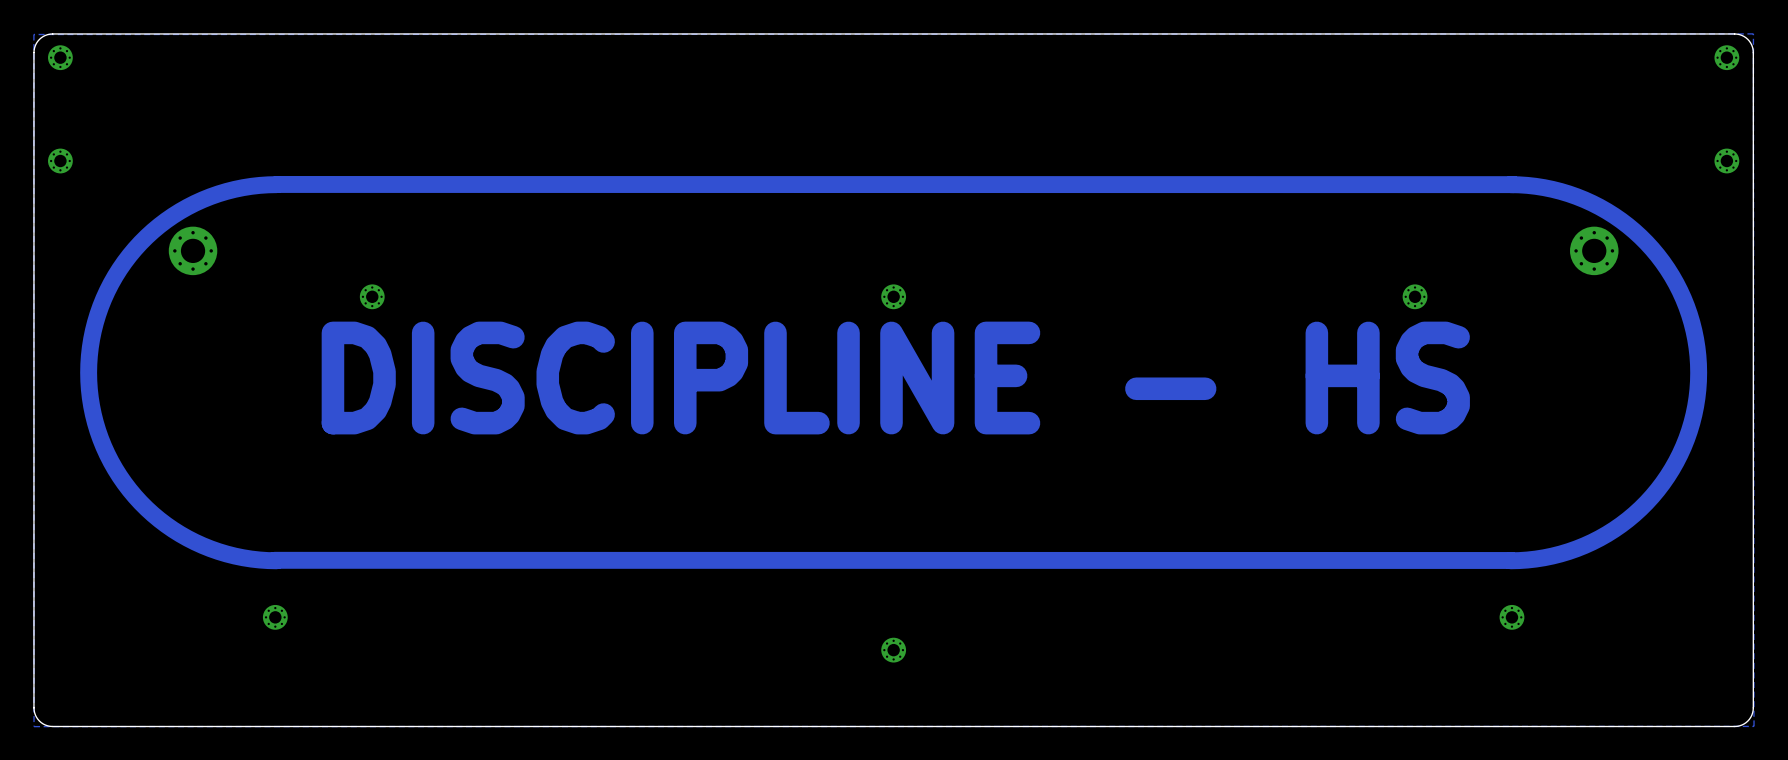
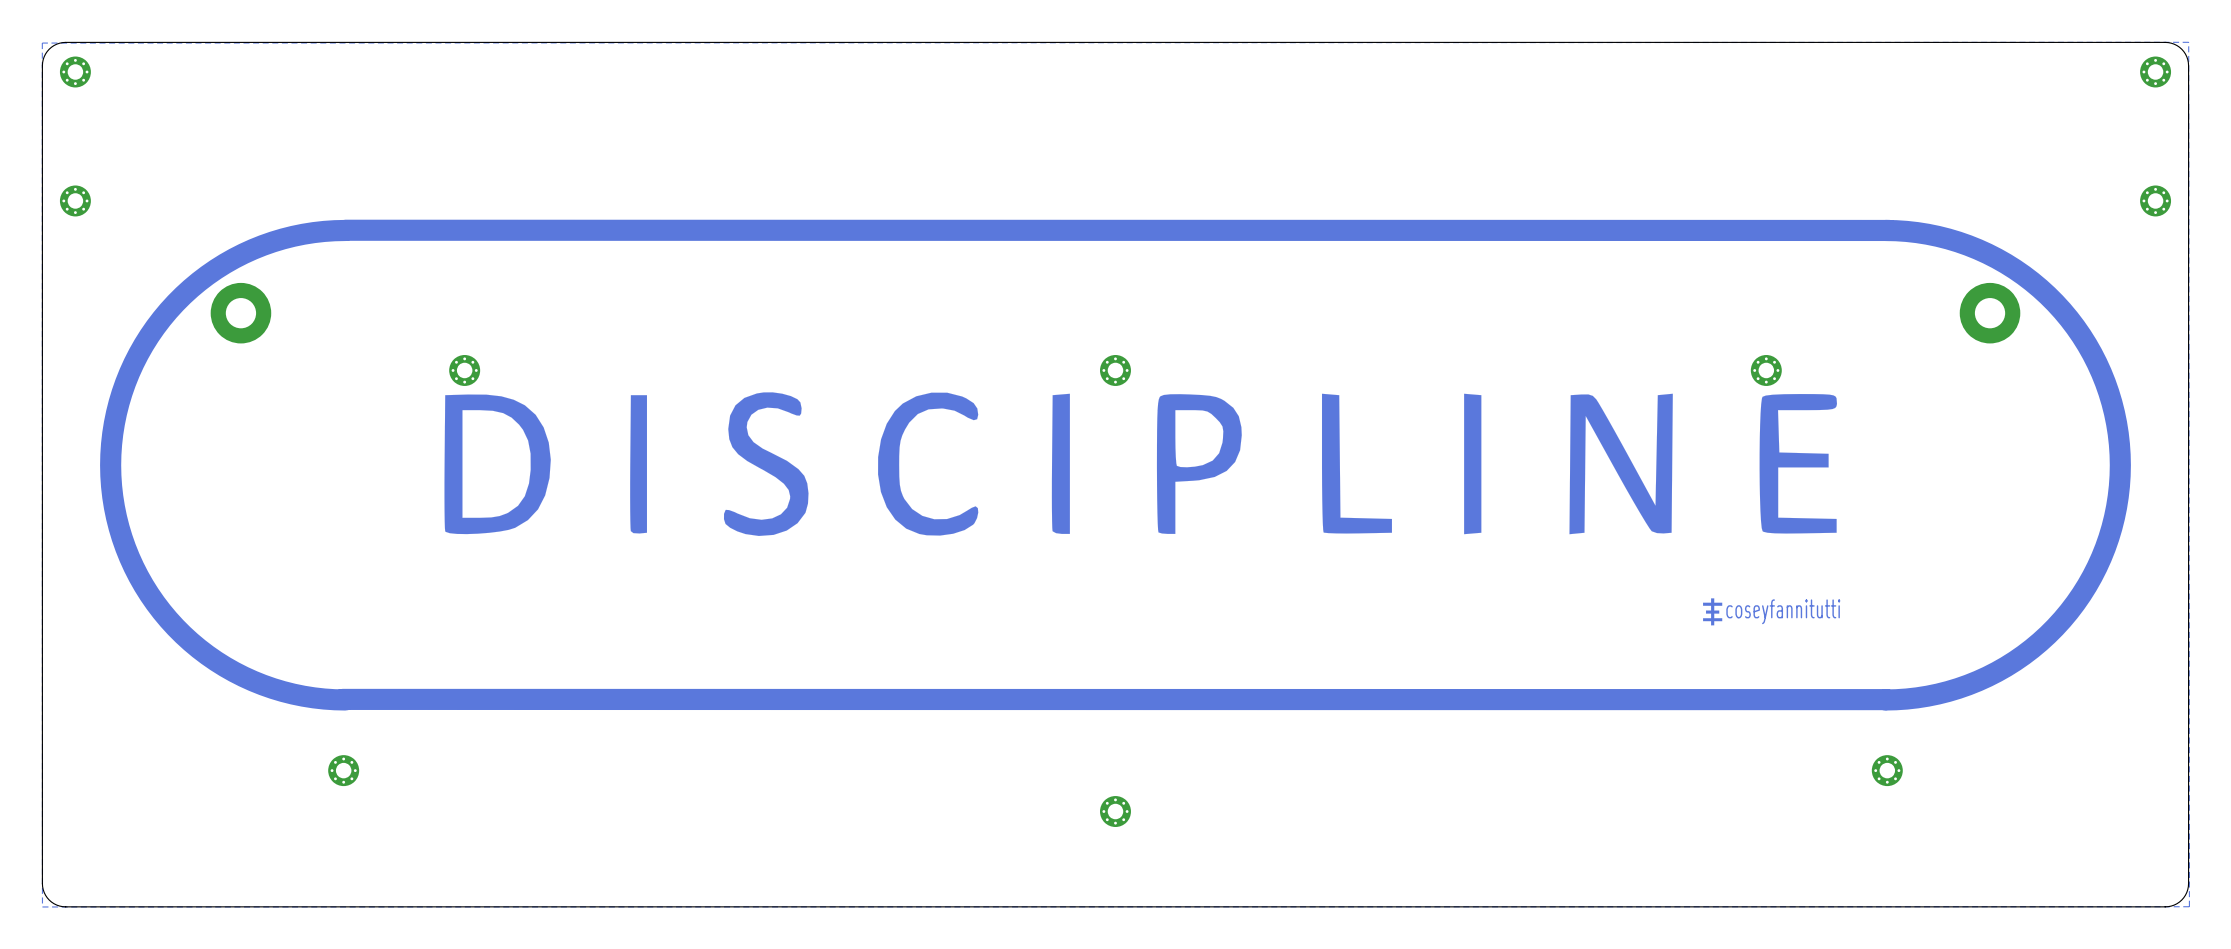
drawing shape: [80, 176, 1708, 570] -> [100, 219, 2131, 711]
part footprint: [168, 226, 218, 276] -> [210, 282, 272, 344]
part footprint: [1570, 226, 1619, 276] -> [1959, 282, 2021, 344]
text: DISCIPLINE - HS (895, 378) -> none
drawing: none -> [1703, 598, 1723, 626]
text: none -> coseyfannitutti (1783, 611)

